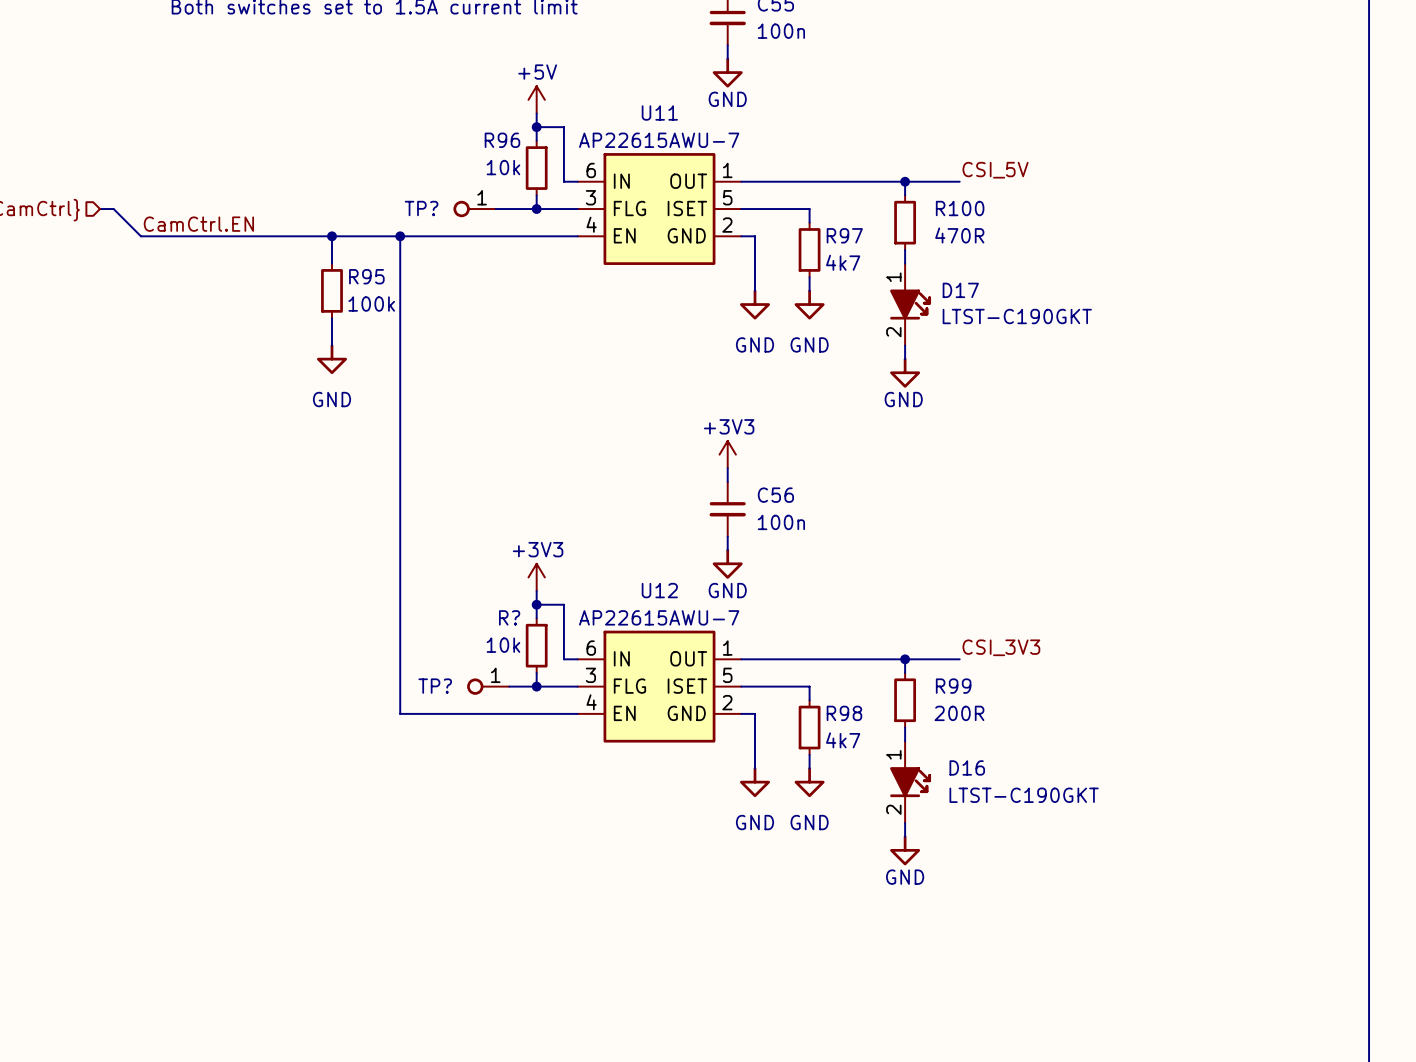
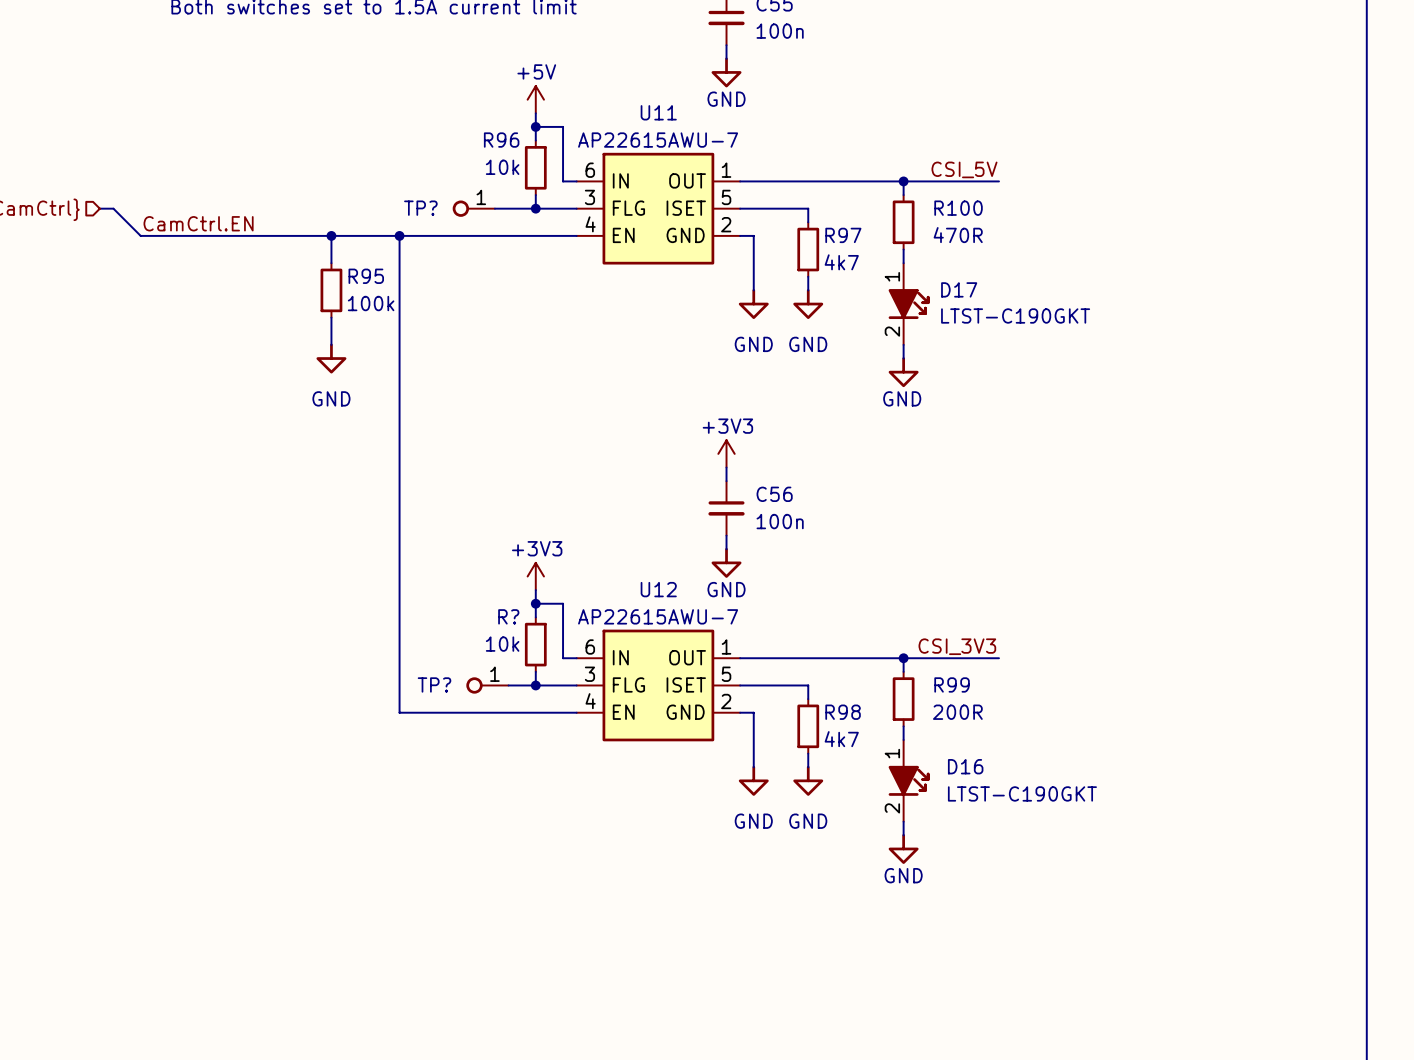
label position: CSI_5V (995, 170) -> CSI_5V (964, 169)
wire: none -> (958, 181) (998, 181)
label position: CSI_3V3 (1001, 647) -> CSI_3V3 (957, 646)
wire: none -> (958, 658) (998, 658)

